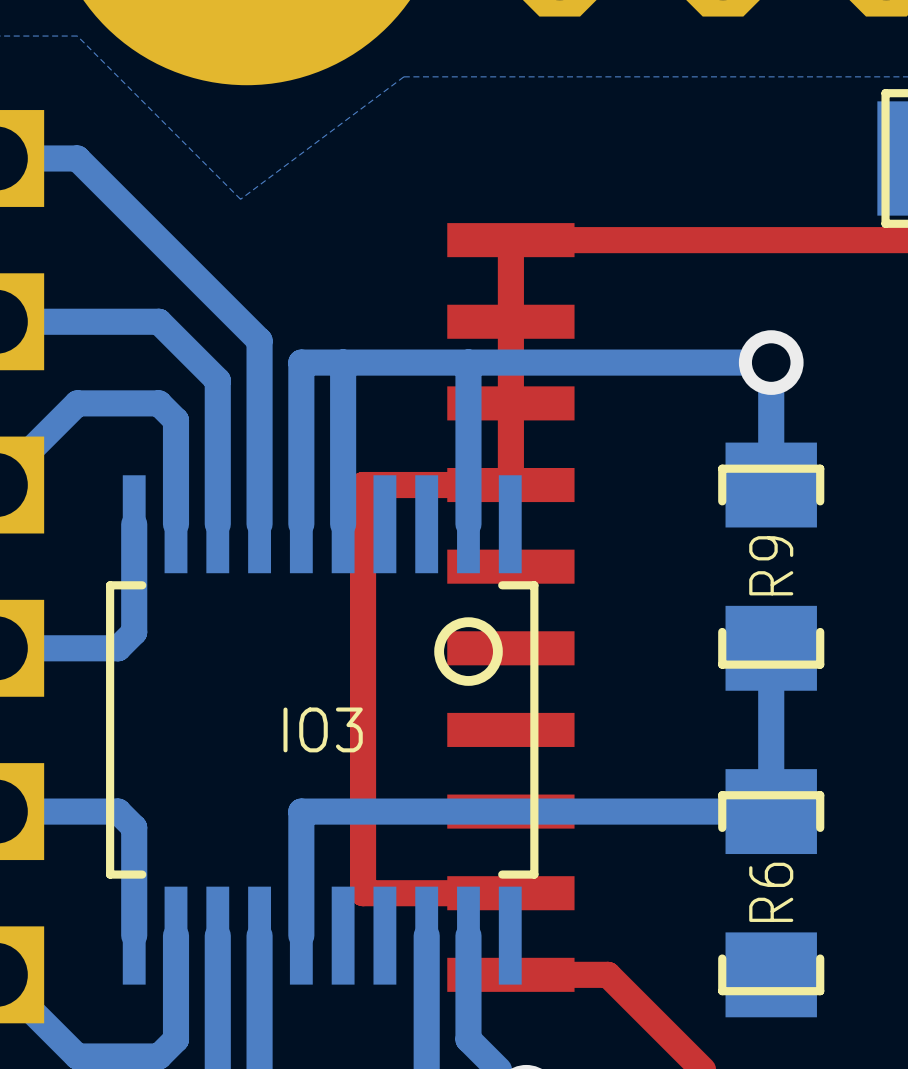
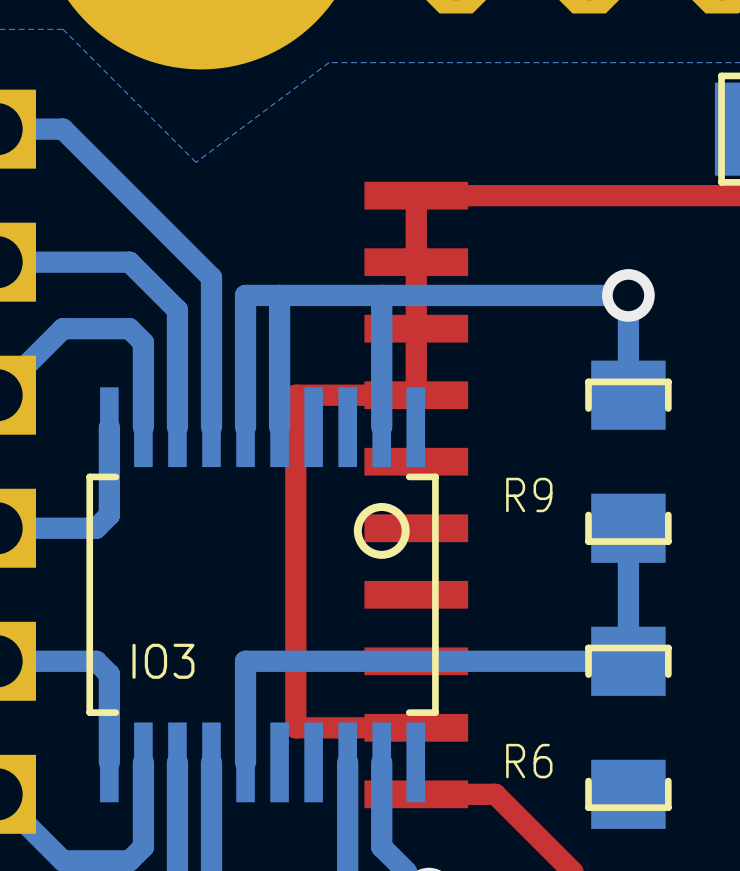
R9 name rotation: 0° (771, 565) -> 90° clockwise (529, 494)
R9 name position: R9 (771, 565) -> R9 (529, 494)
IO3 name position: IO3 (323, 729) -> IO3 (163, 661)
R6 name rotation: 0° (771, 892) -> 90° clockwise (529, 761)
R6 name position: R6 (771, 892) -> R6 (529, 761)

